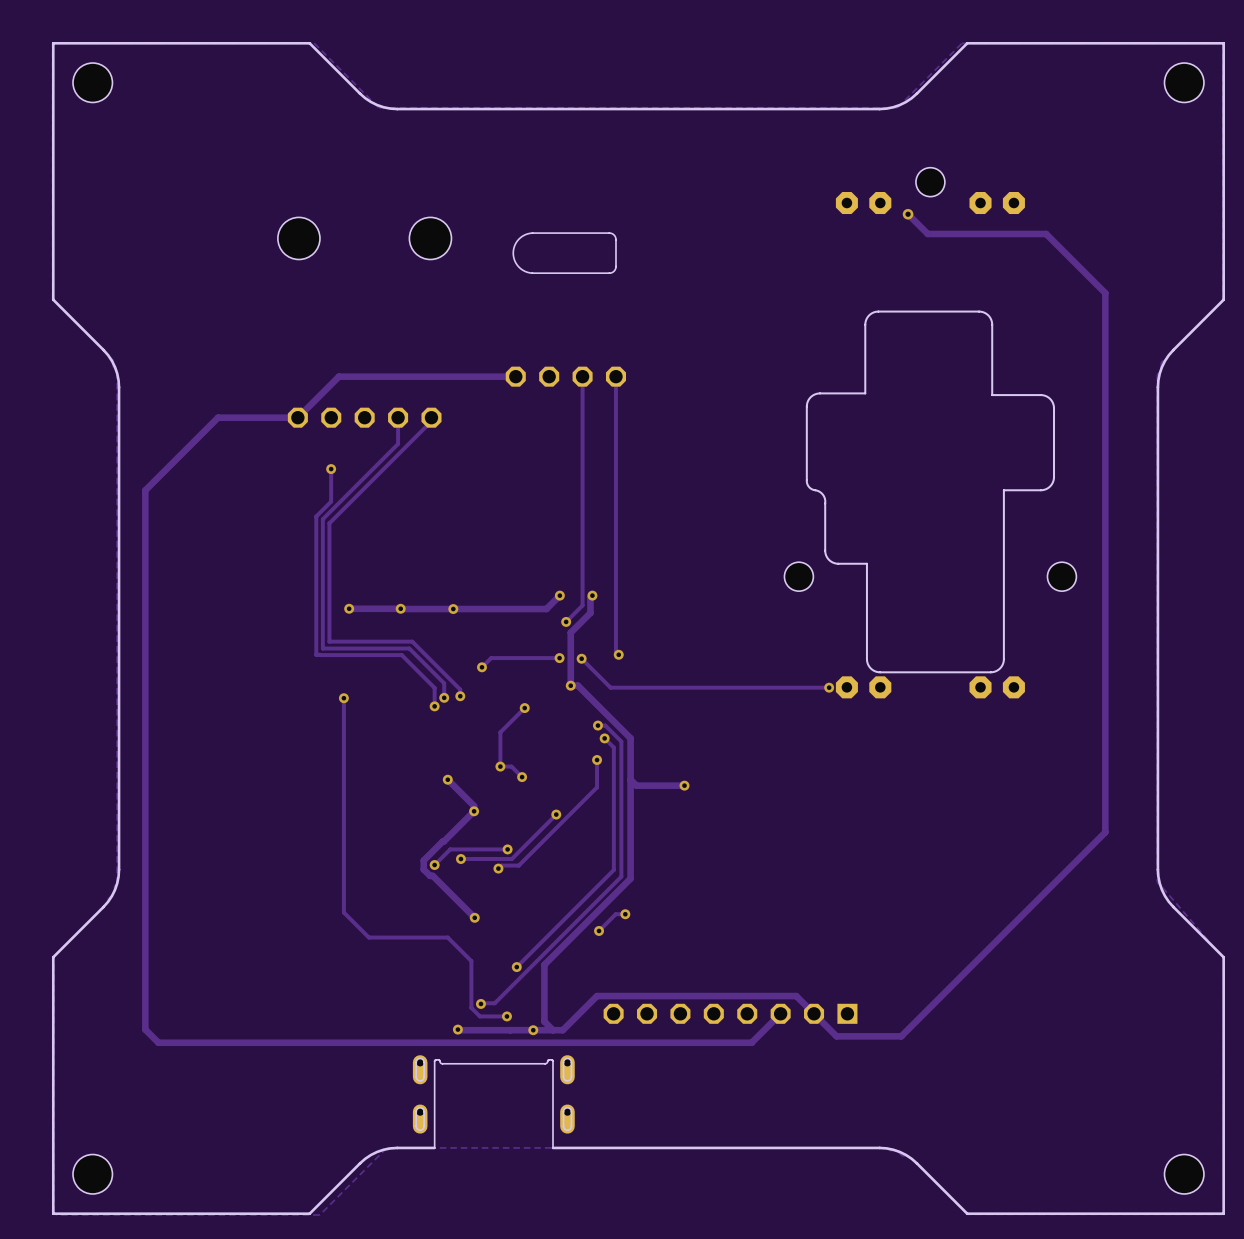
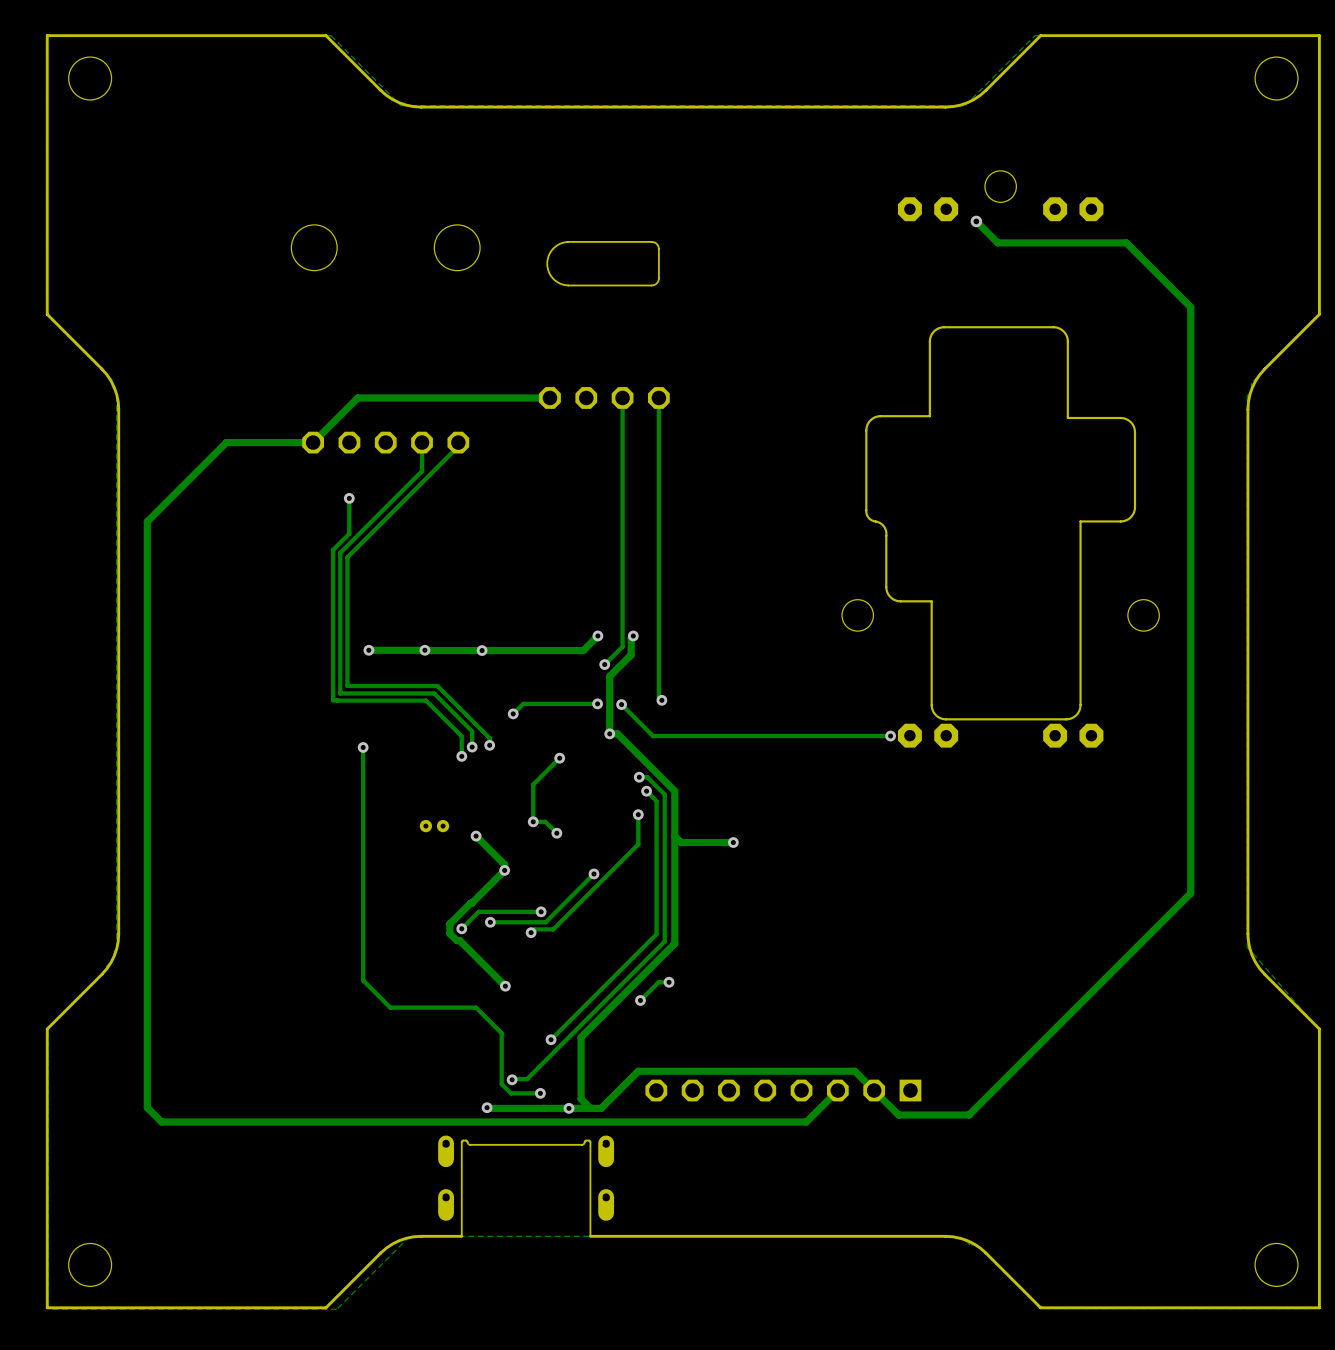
part: none -> (434, 826)

